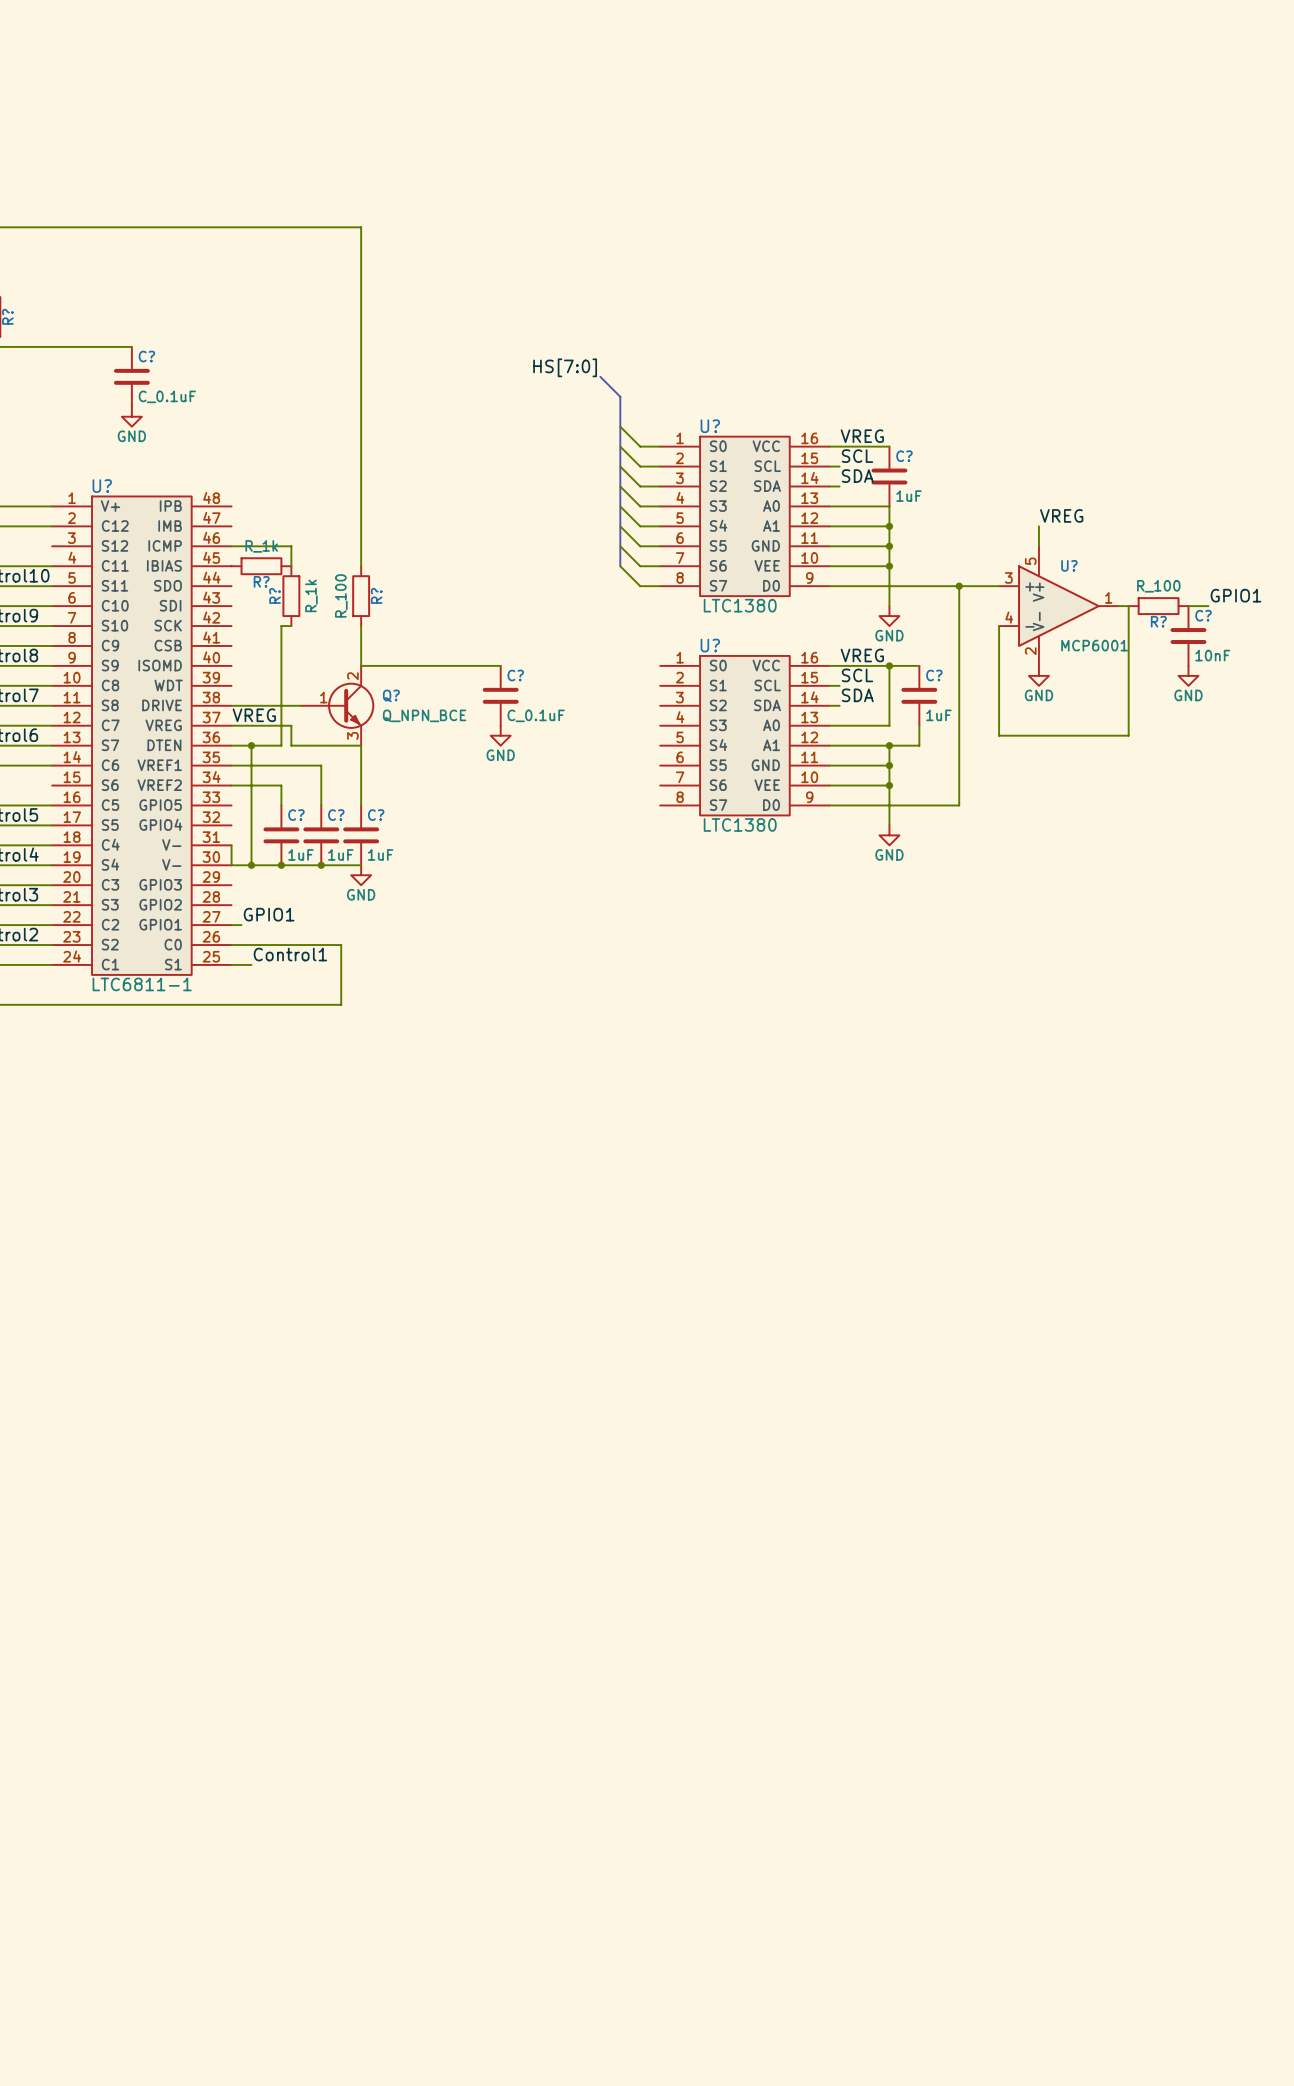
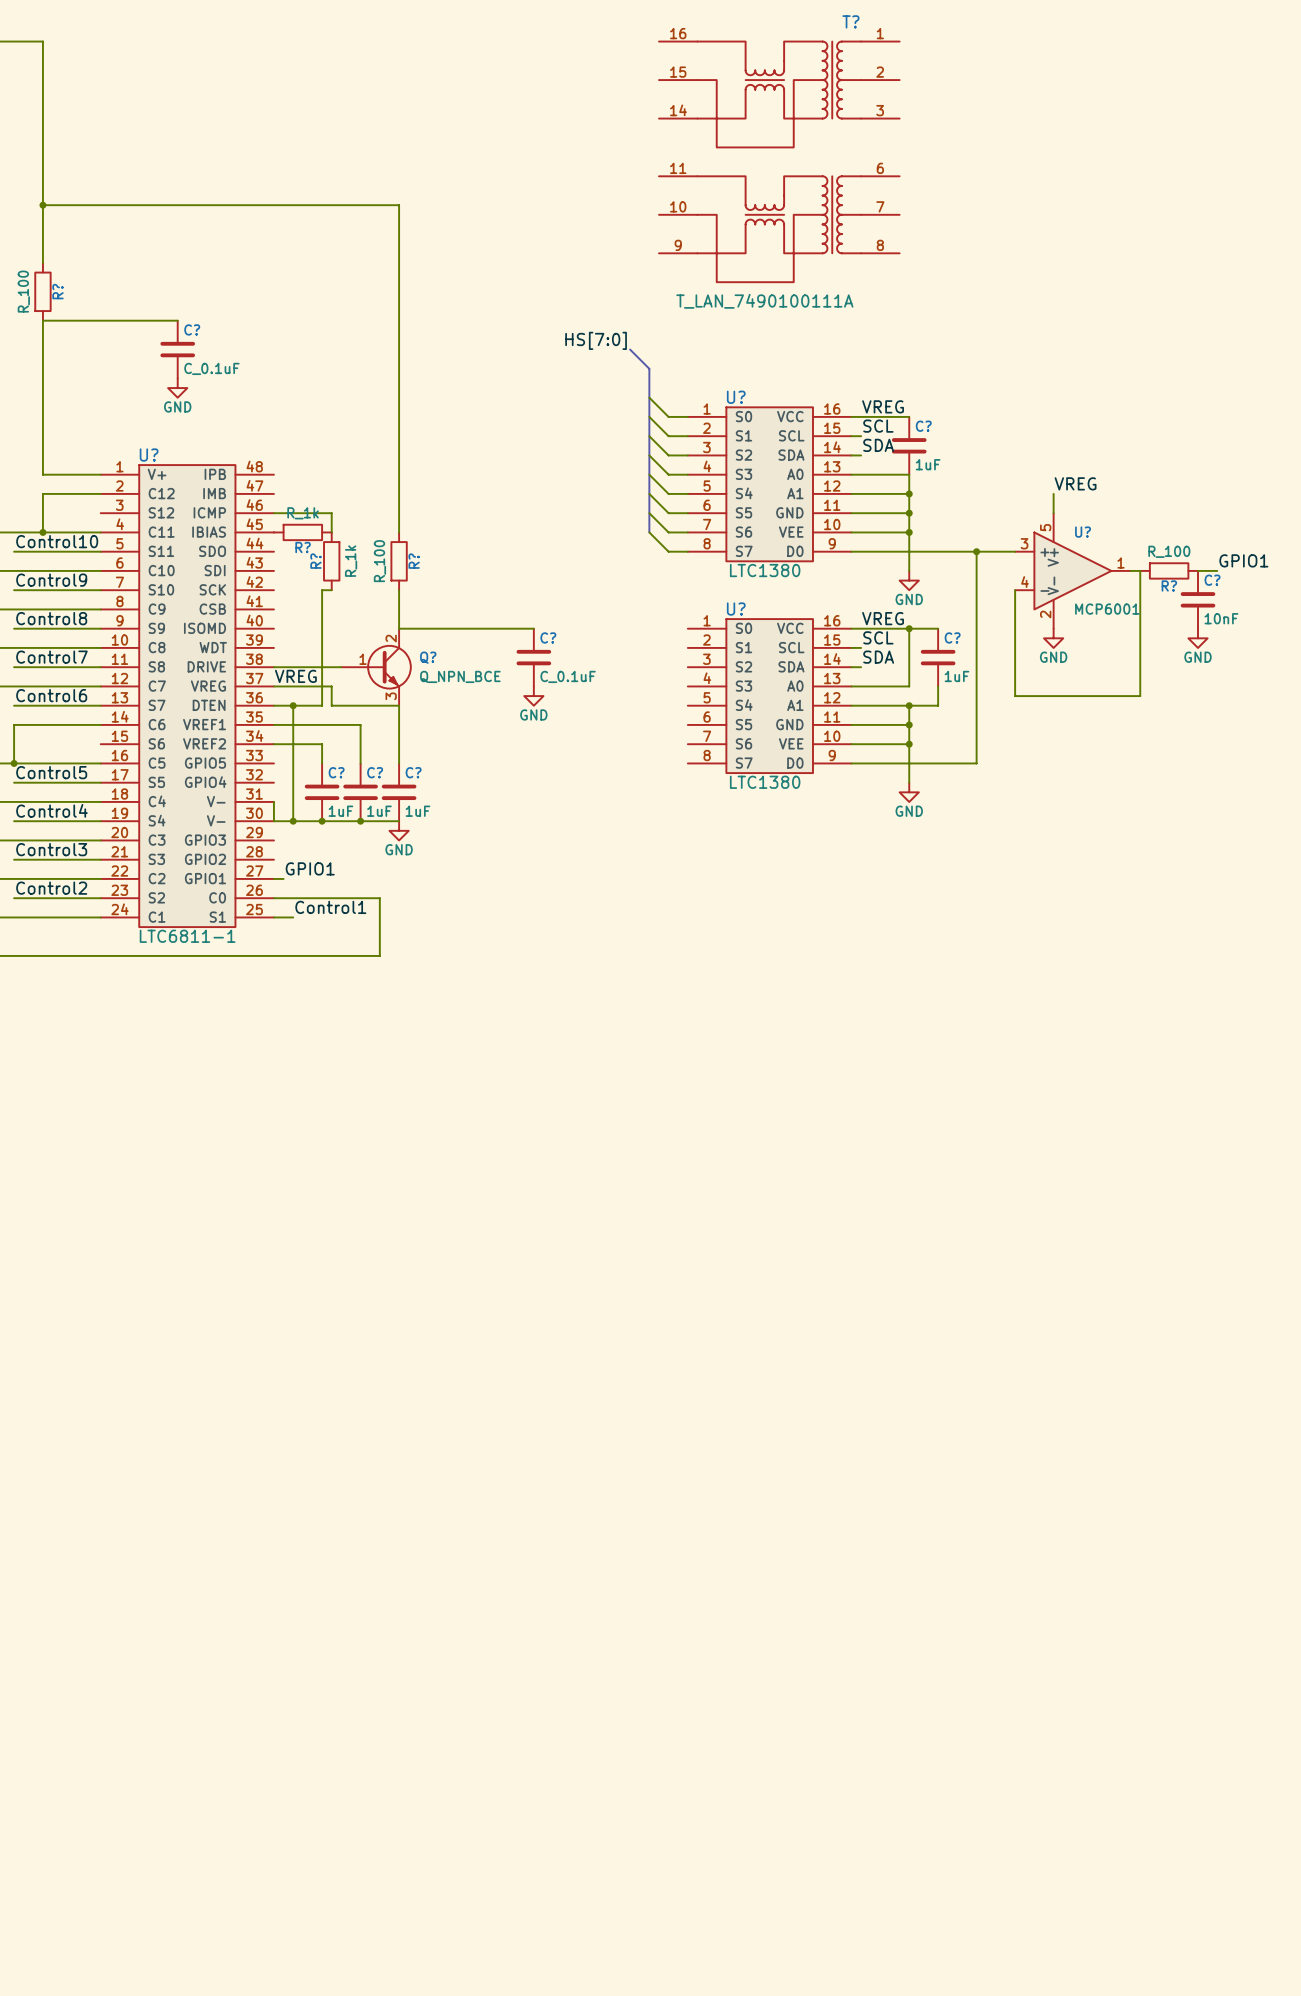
T?: none -> T_LAN_7490100111A (779, 161)

